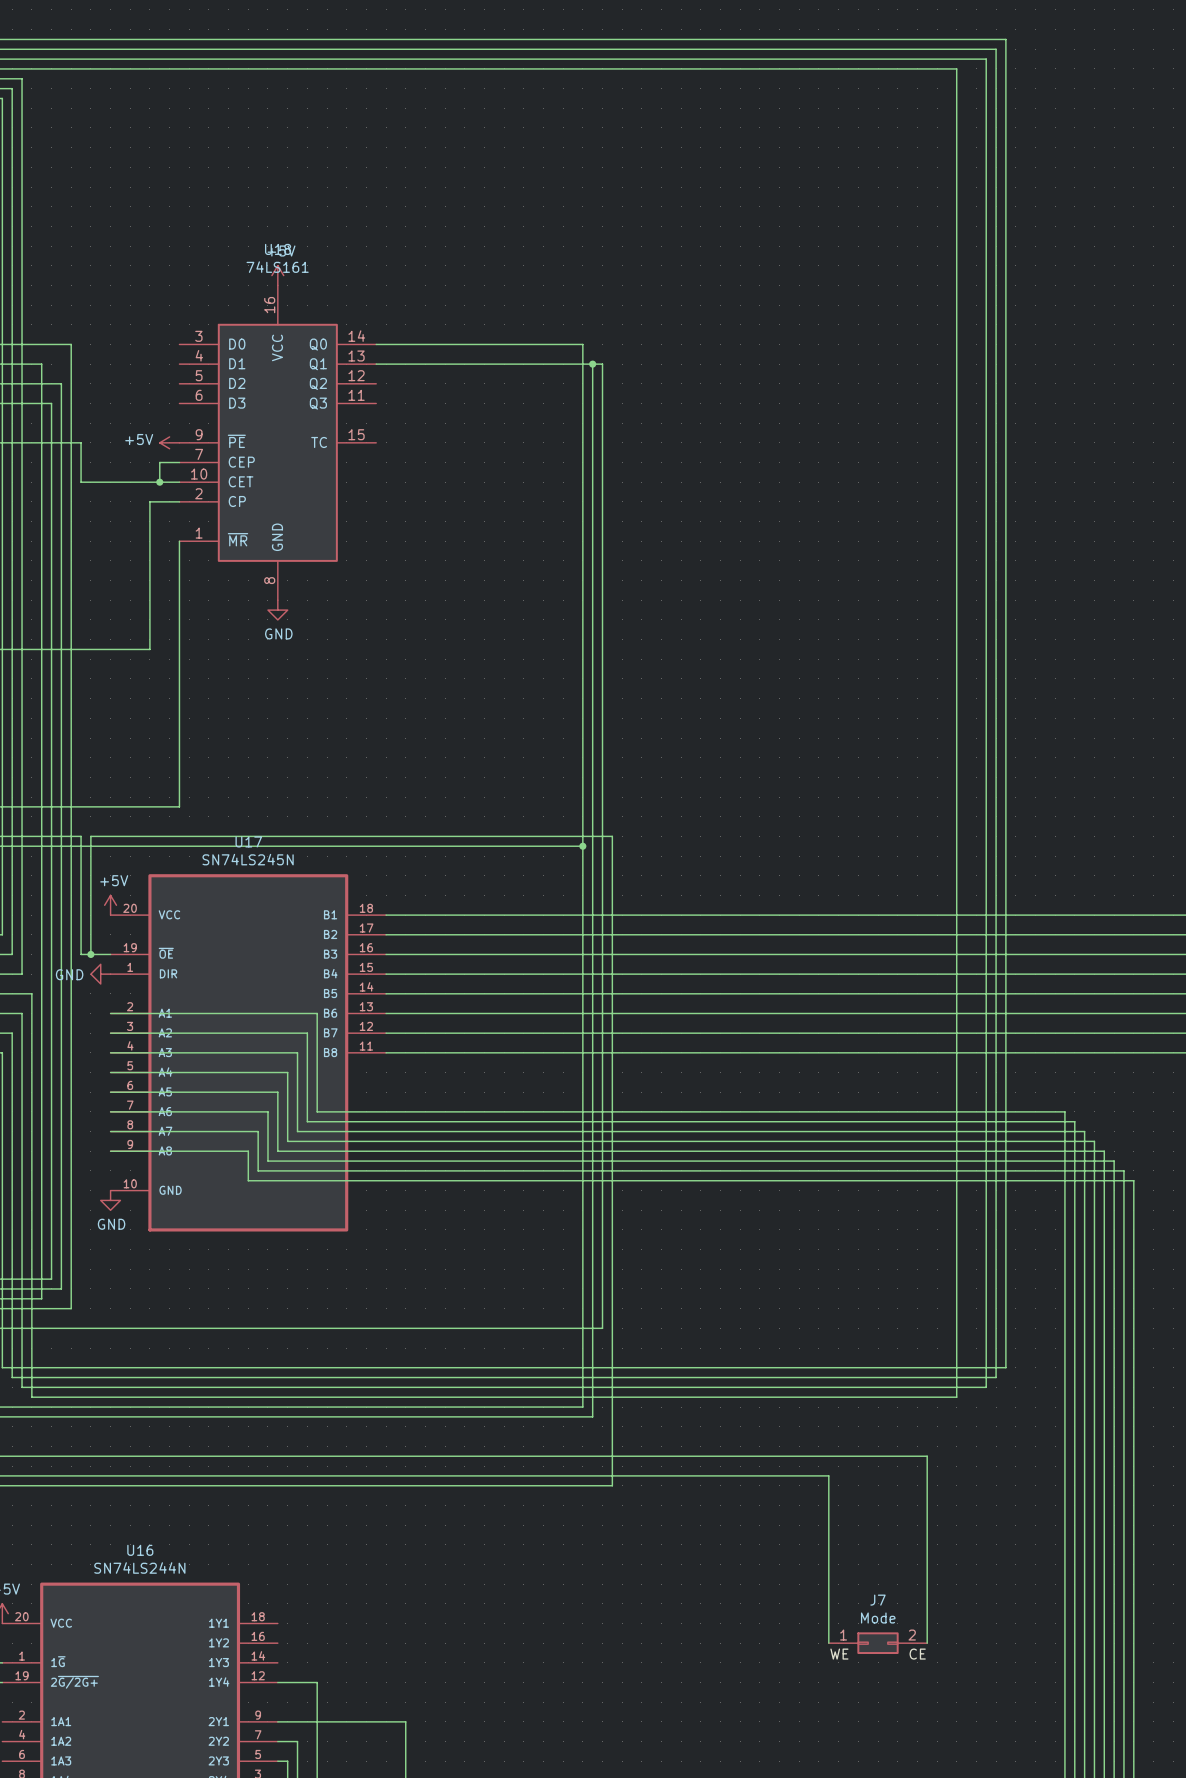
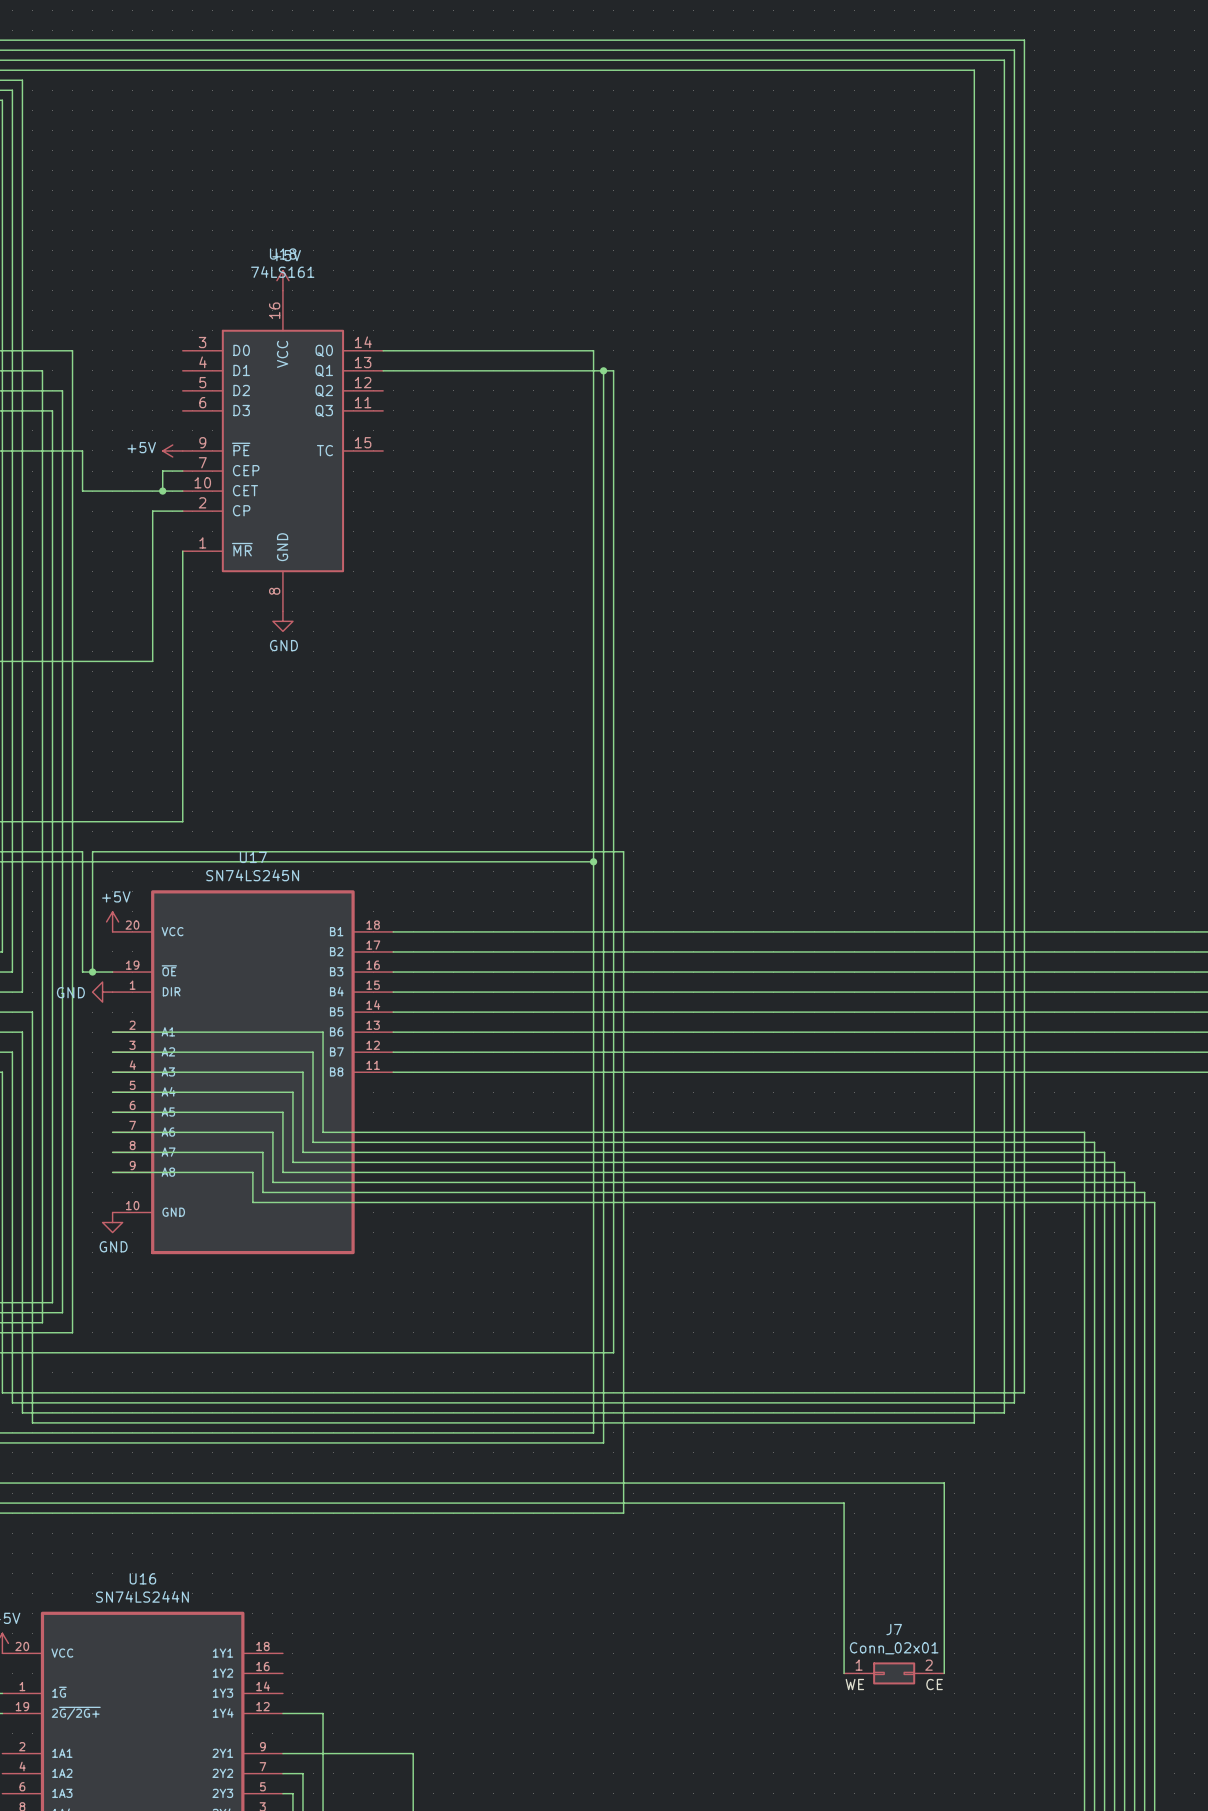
J7 value: Mode (878, 1618) -> Conn_02x01 (894, 1648)

